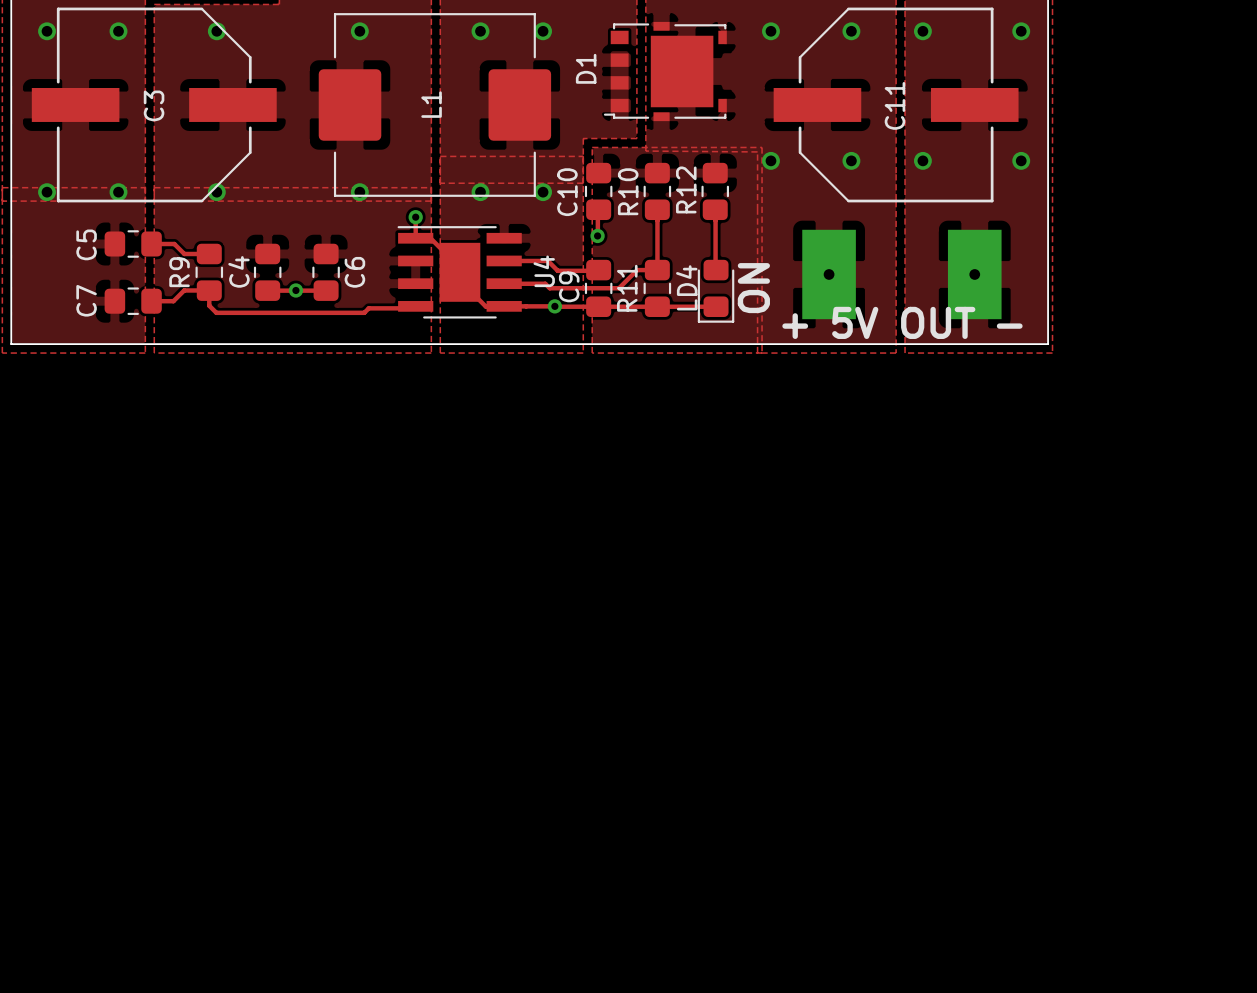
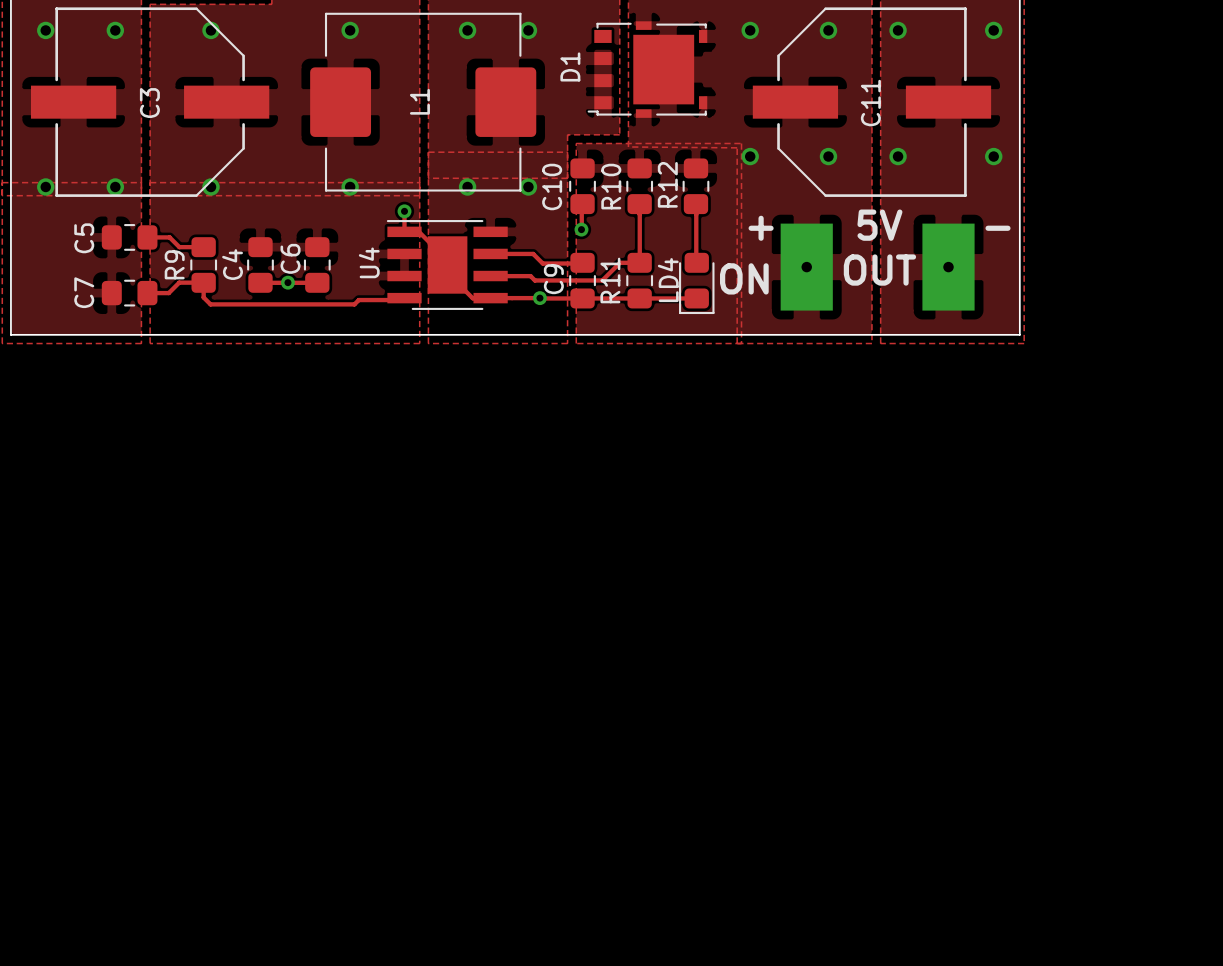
text: none -> 5V (879, 225)
U4 name position: U4 (544, 271) -> U4 (369, 262)
C6 name position: C6 (354, 272) -> C6 (290, 258)
text rotation: 0° (753, 288) -> 90° clockwise (744, 278)
text: 5V OUT (903, 322) -> OUT (879, 270)
text position: + (795, 326) -> + (761, 228)
text position: - (1009, 326) -> - (998, 228)

